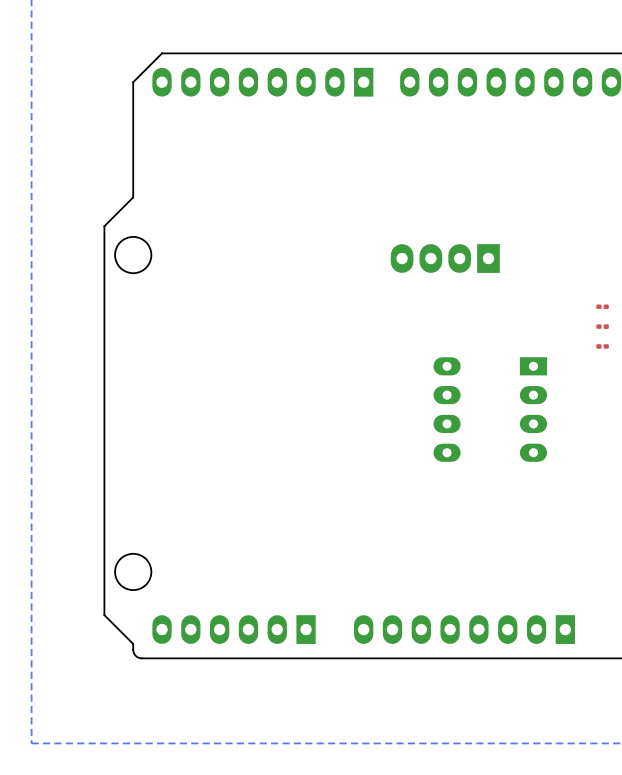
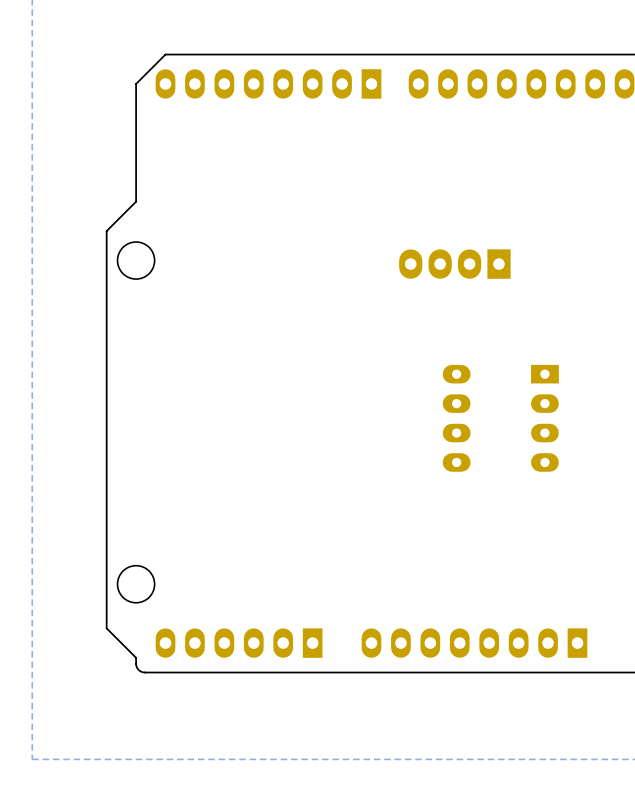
part: (602, 306) -> none
part: (602, 326) -> none
part: (602, 346) -> none

